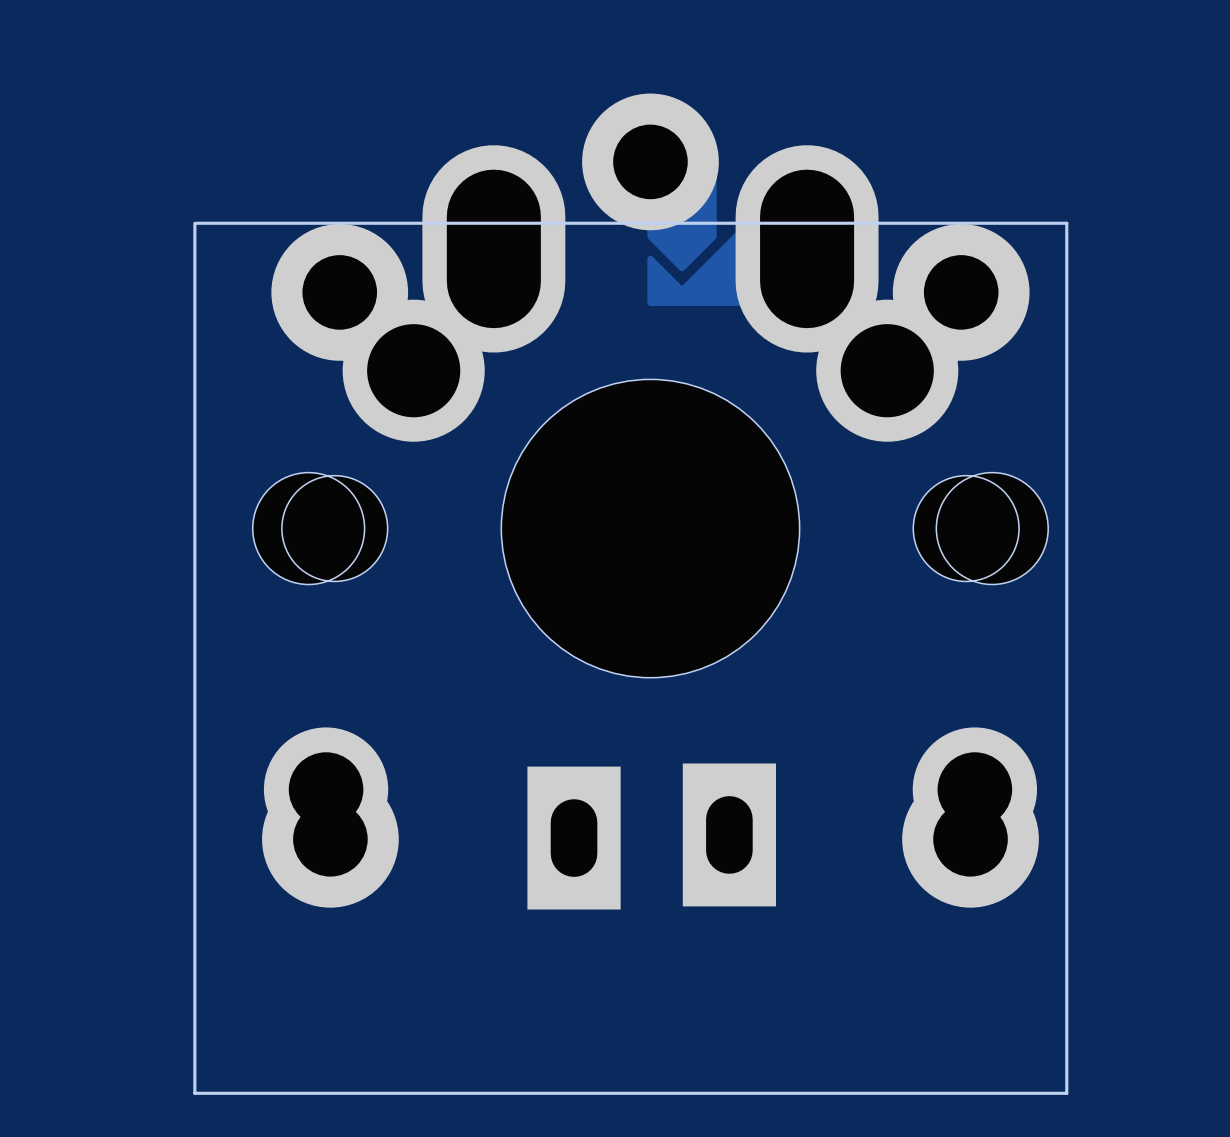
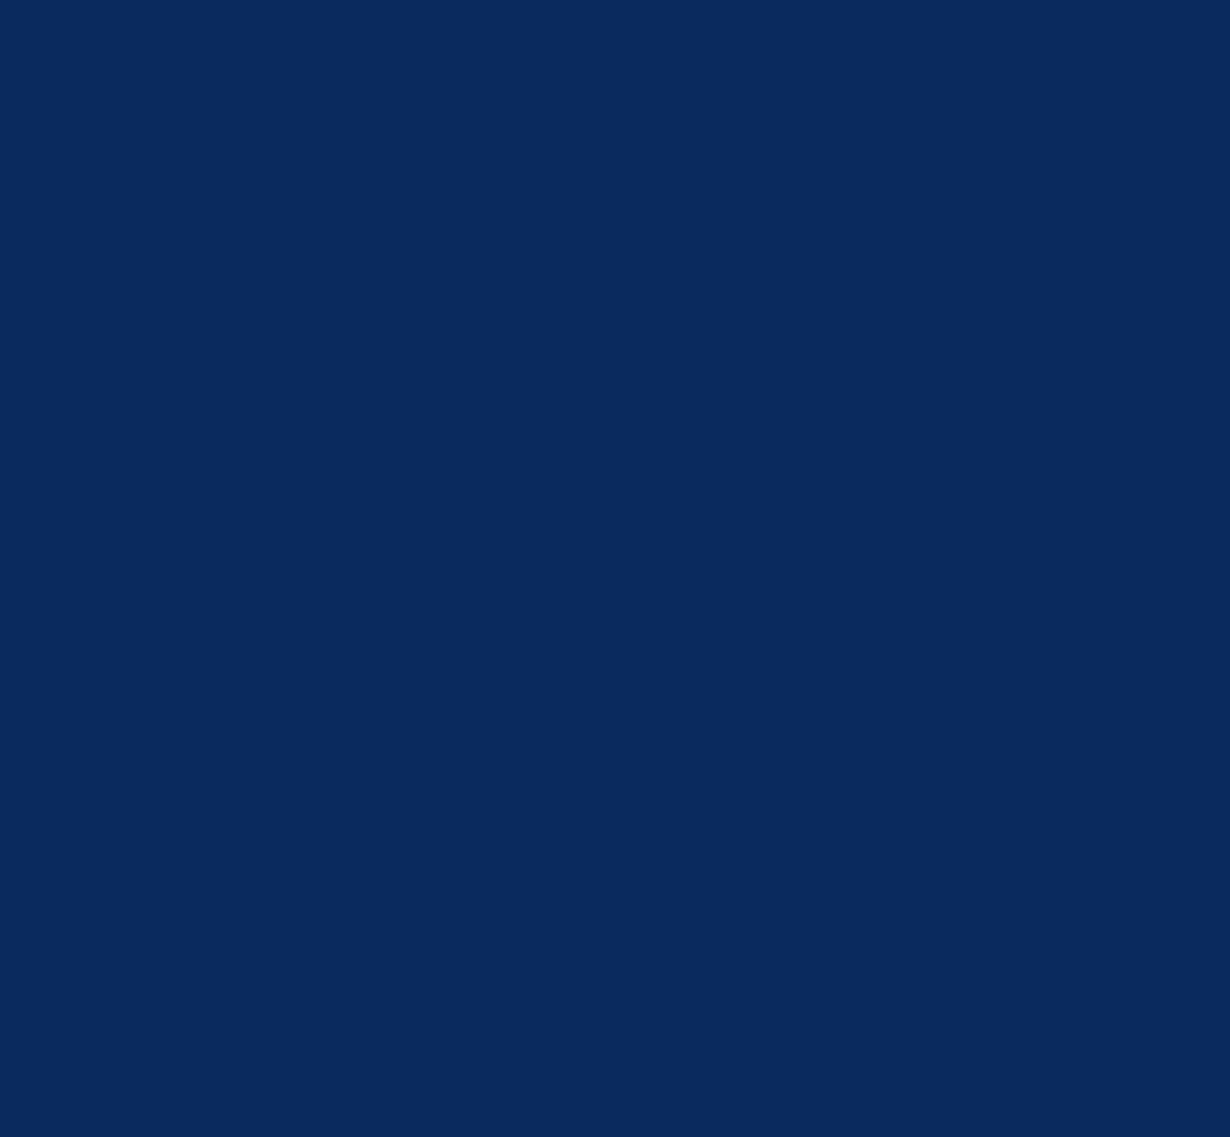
board edge: (194, 223) (194, 1093) (1066, 1093) (1066, 223) (196, 223) -> none
part: (650, 501) -> none

